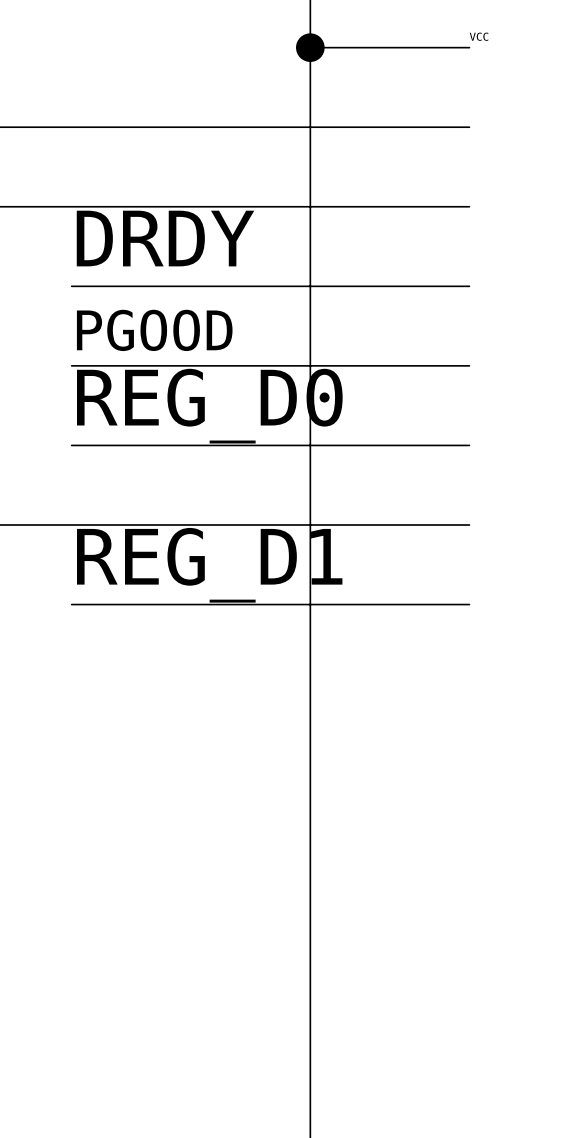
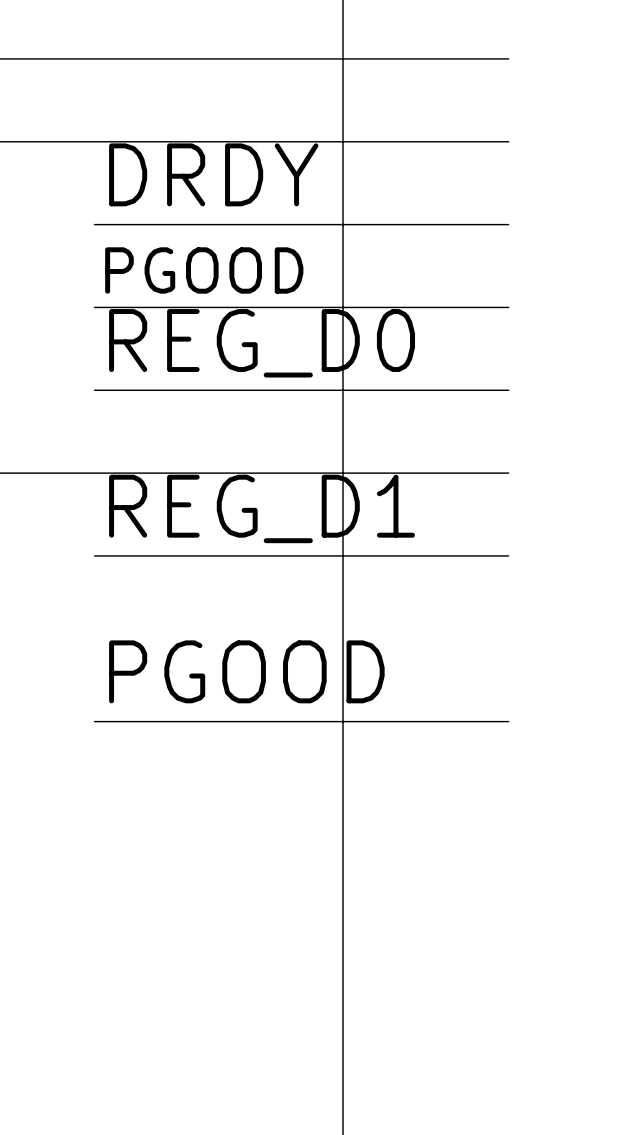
label: none -> PGOOD (246, 671)
wire: none -> (94, 721) (508, 721)

